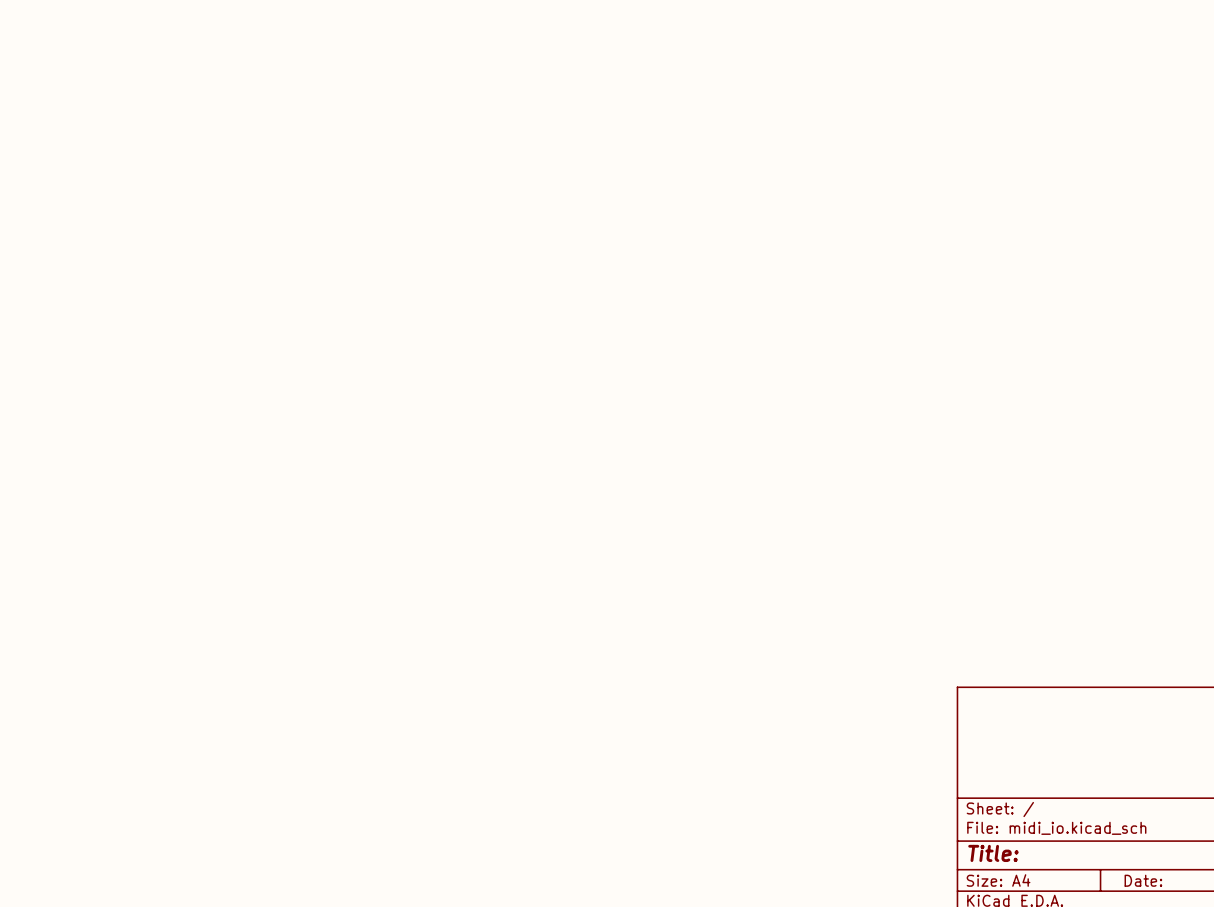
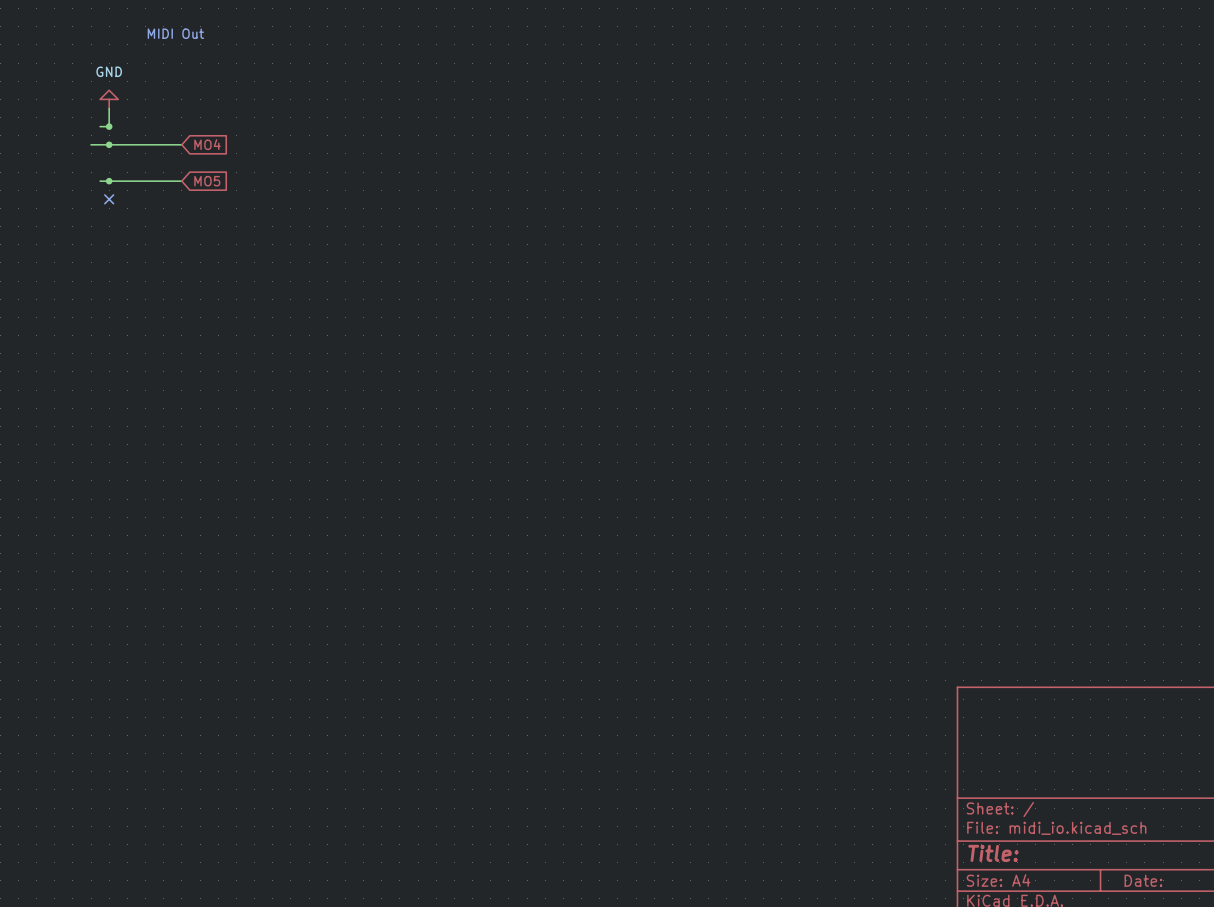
text: none -> MIDI Out (175, 33)
power symbol: none -> GND (109, 99)
wire: none -> (109, 108) (109, 126) (100, 126)
junction: none -> (109, 126)
wire: none -> (91, 144) (181, 144)
junction: none -> (109, 144)
global label: none -> MO4 (207, 144)
wire: none -> (100, 181) (181, 181)
junction: none -> (109, 181)
global label: none -> MO5 (207, 181)
no-connect mark: none -> (109, 199)

